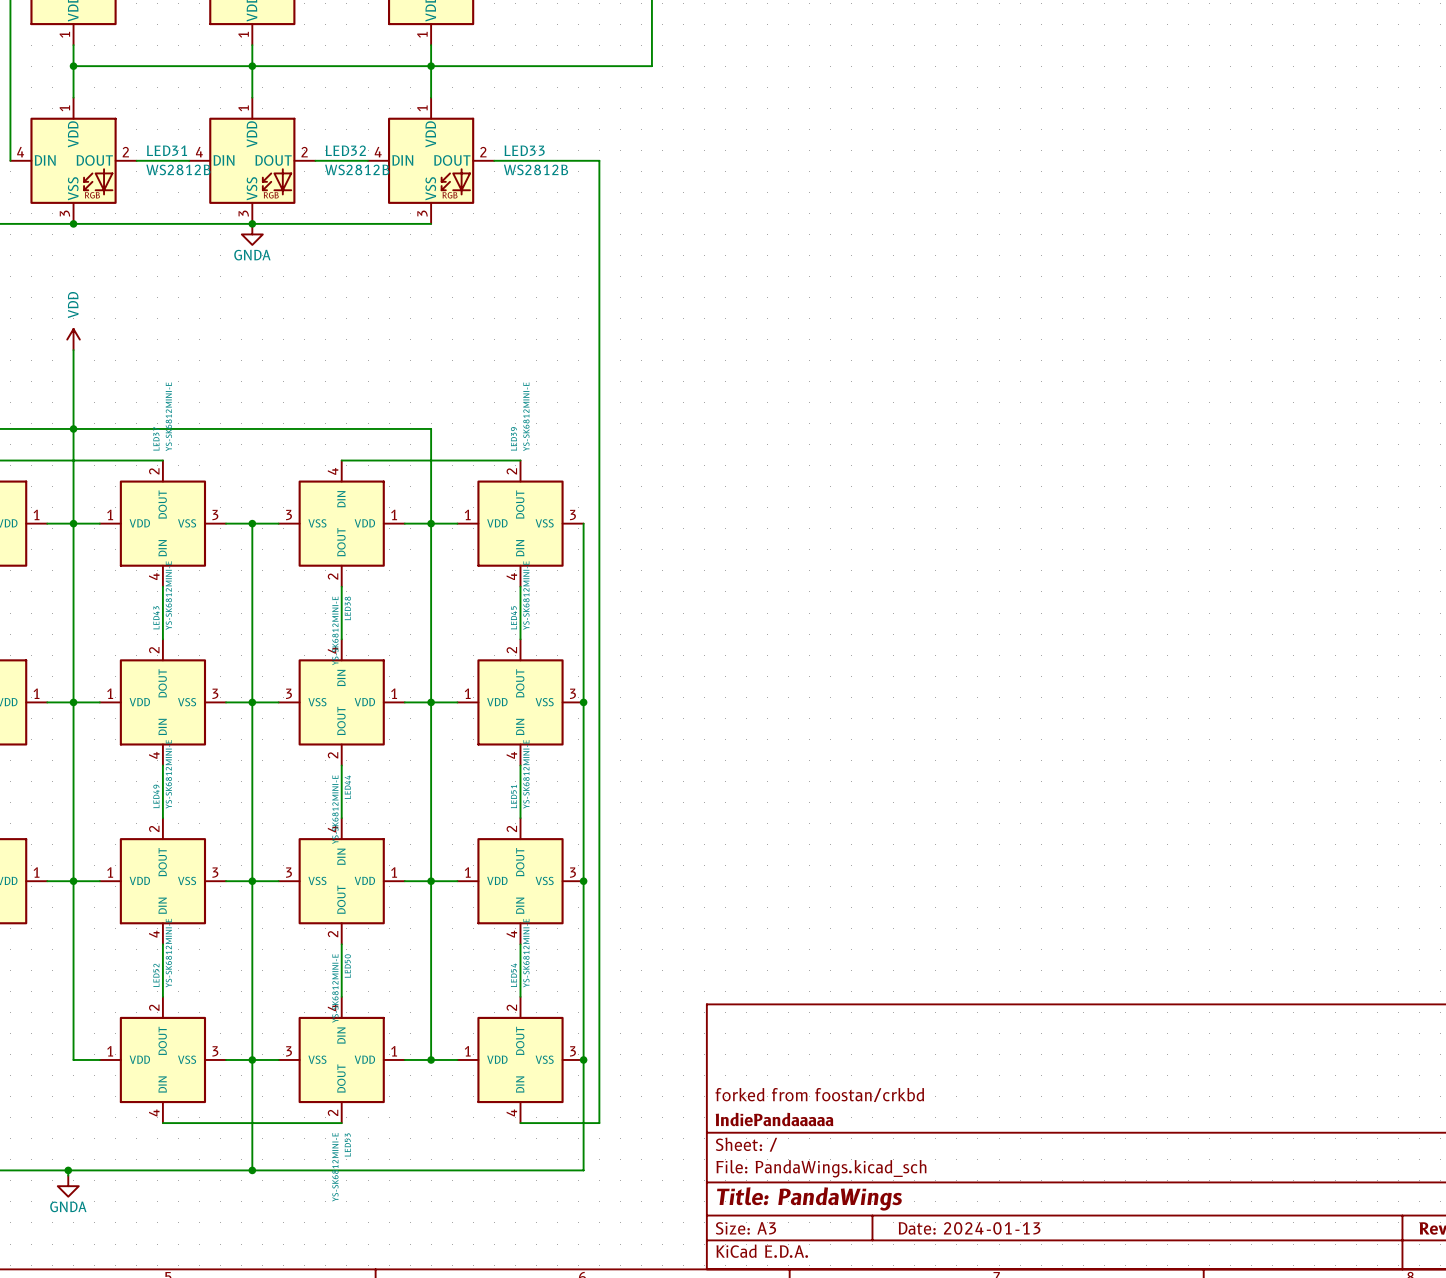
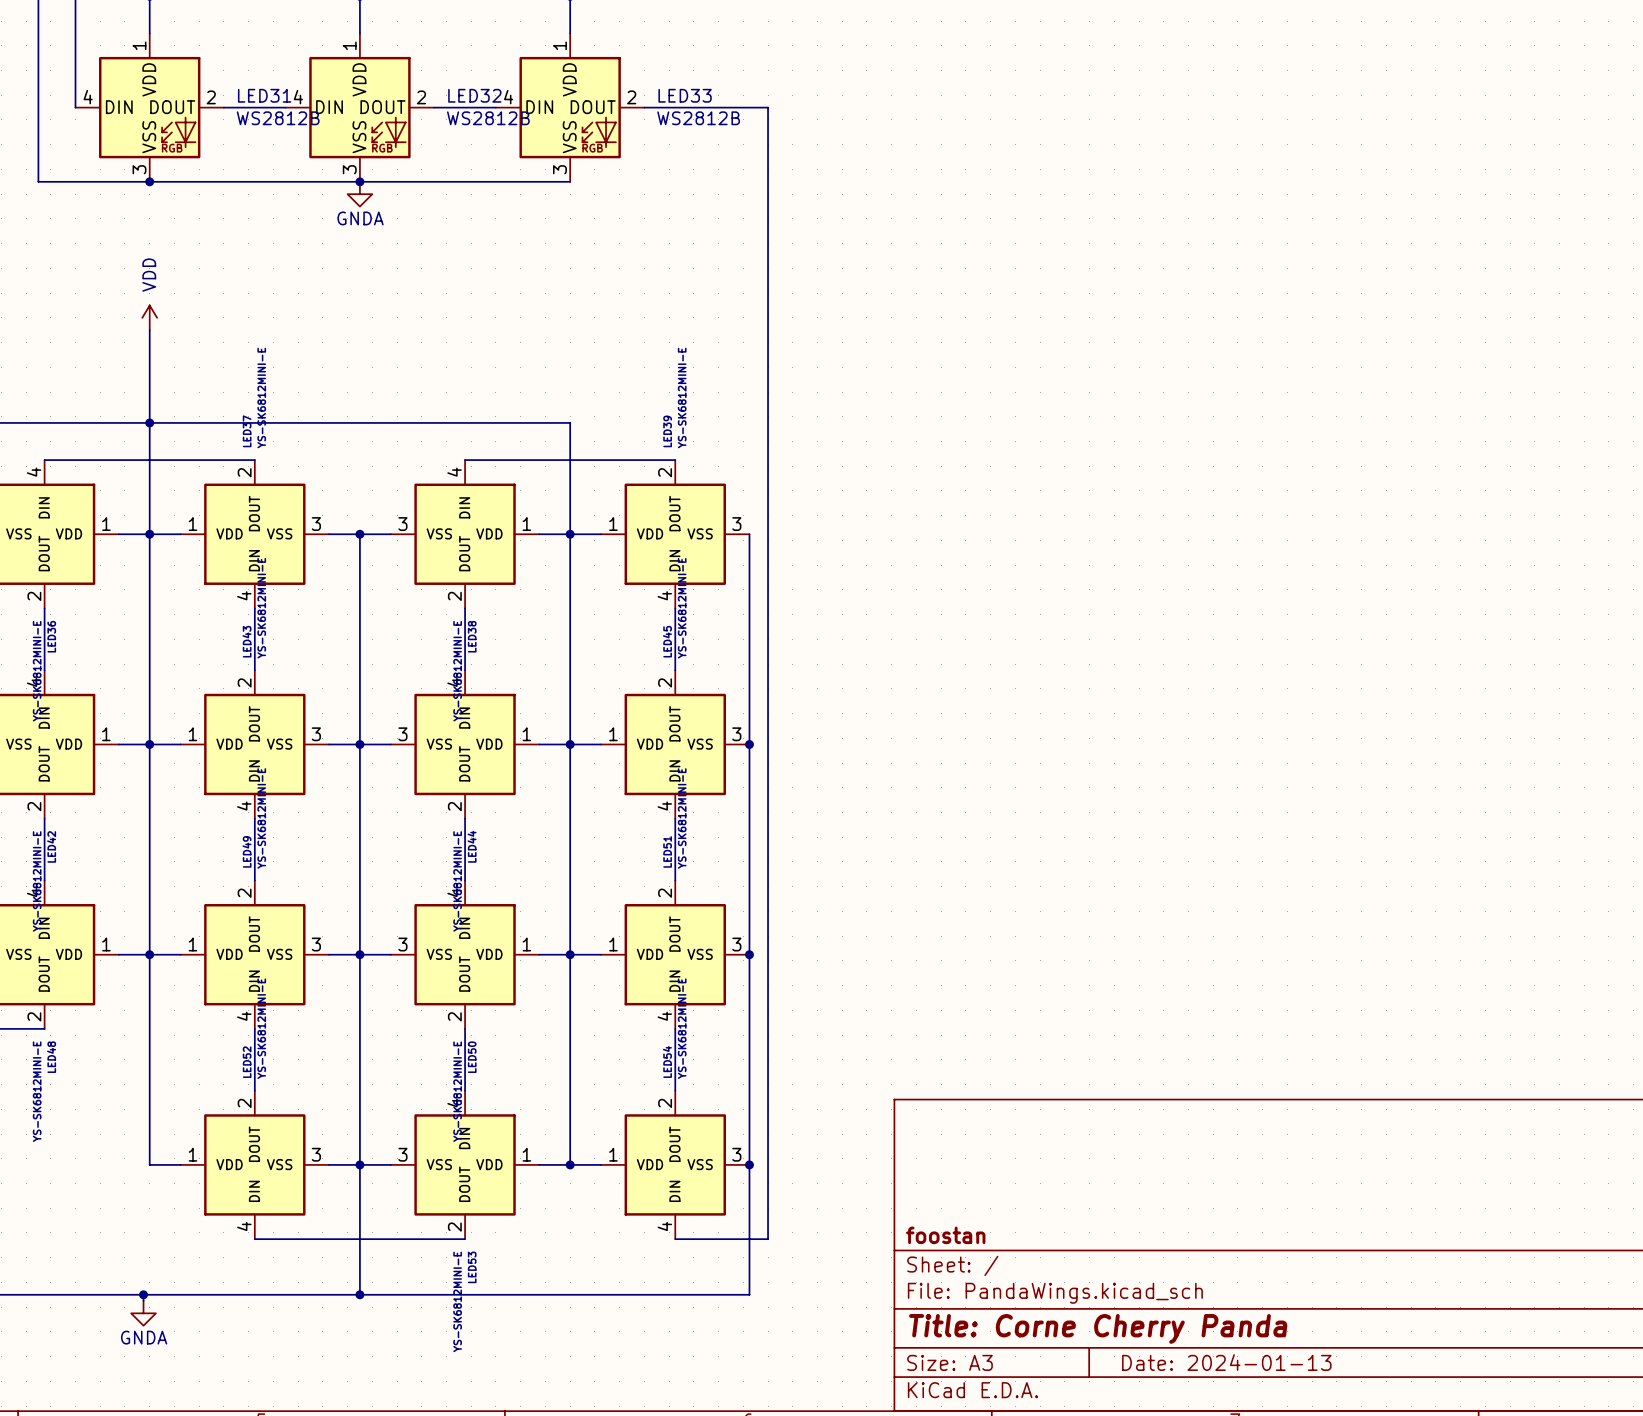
title block: forked from foostan/crkbd (819, 1095) -> none
title block: IndiePandaaaaa (774, 1119) -> foostan (945, 1235)
title block: Title: PandaWings (809, 1198) -> Title: Corne Cherry Panda (1098, 1328)

